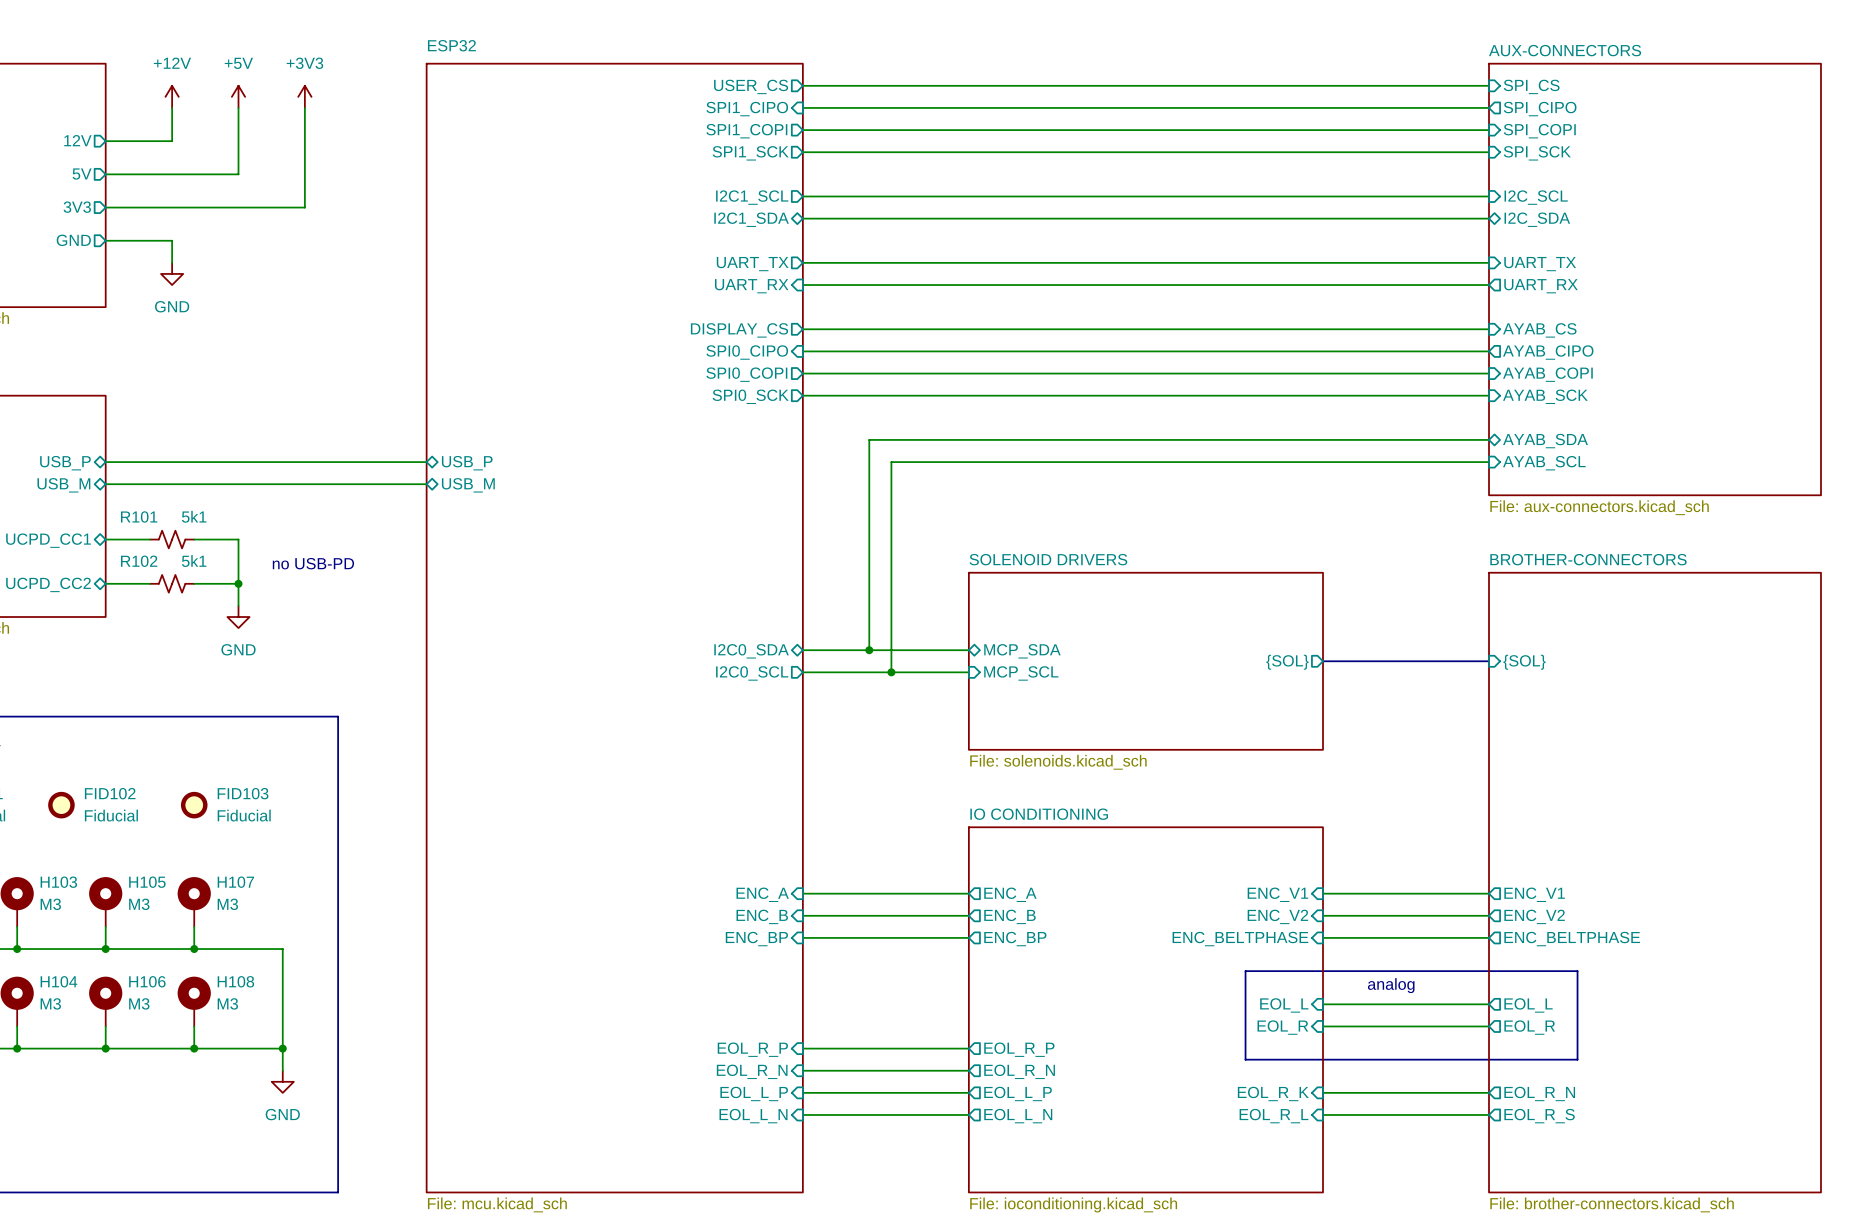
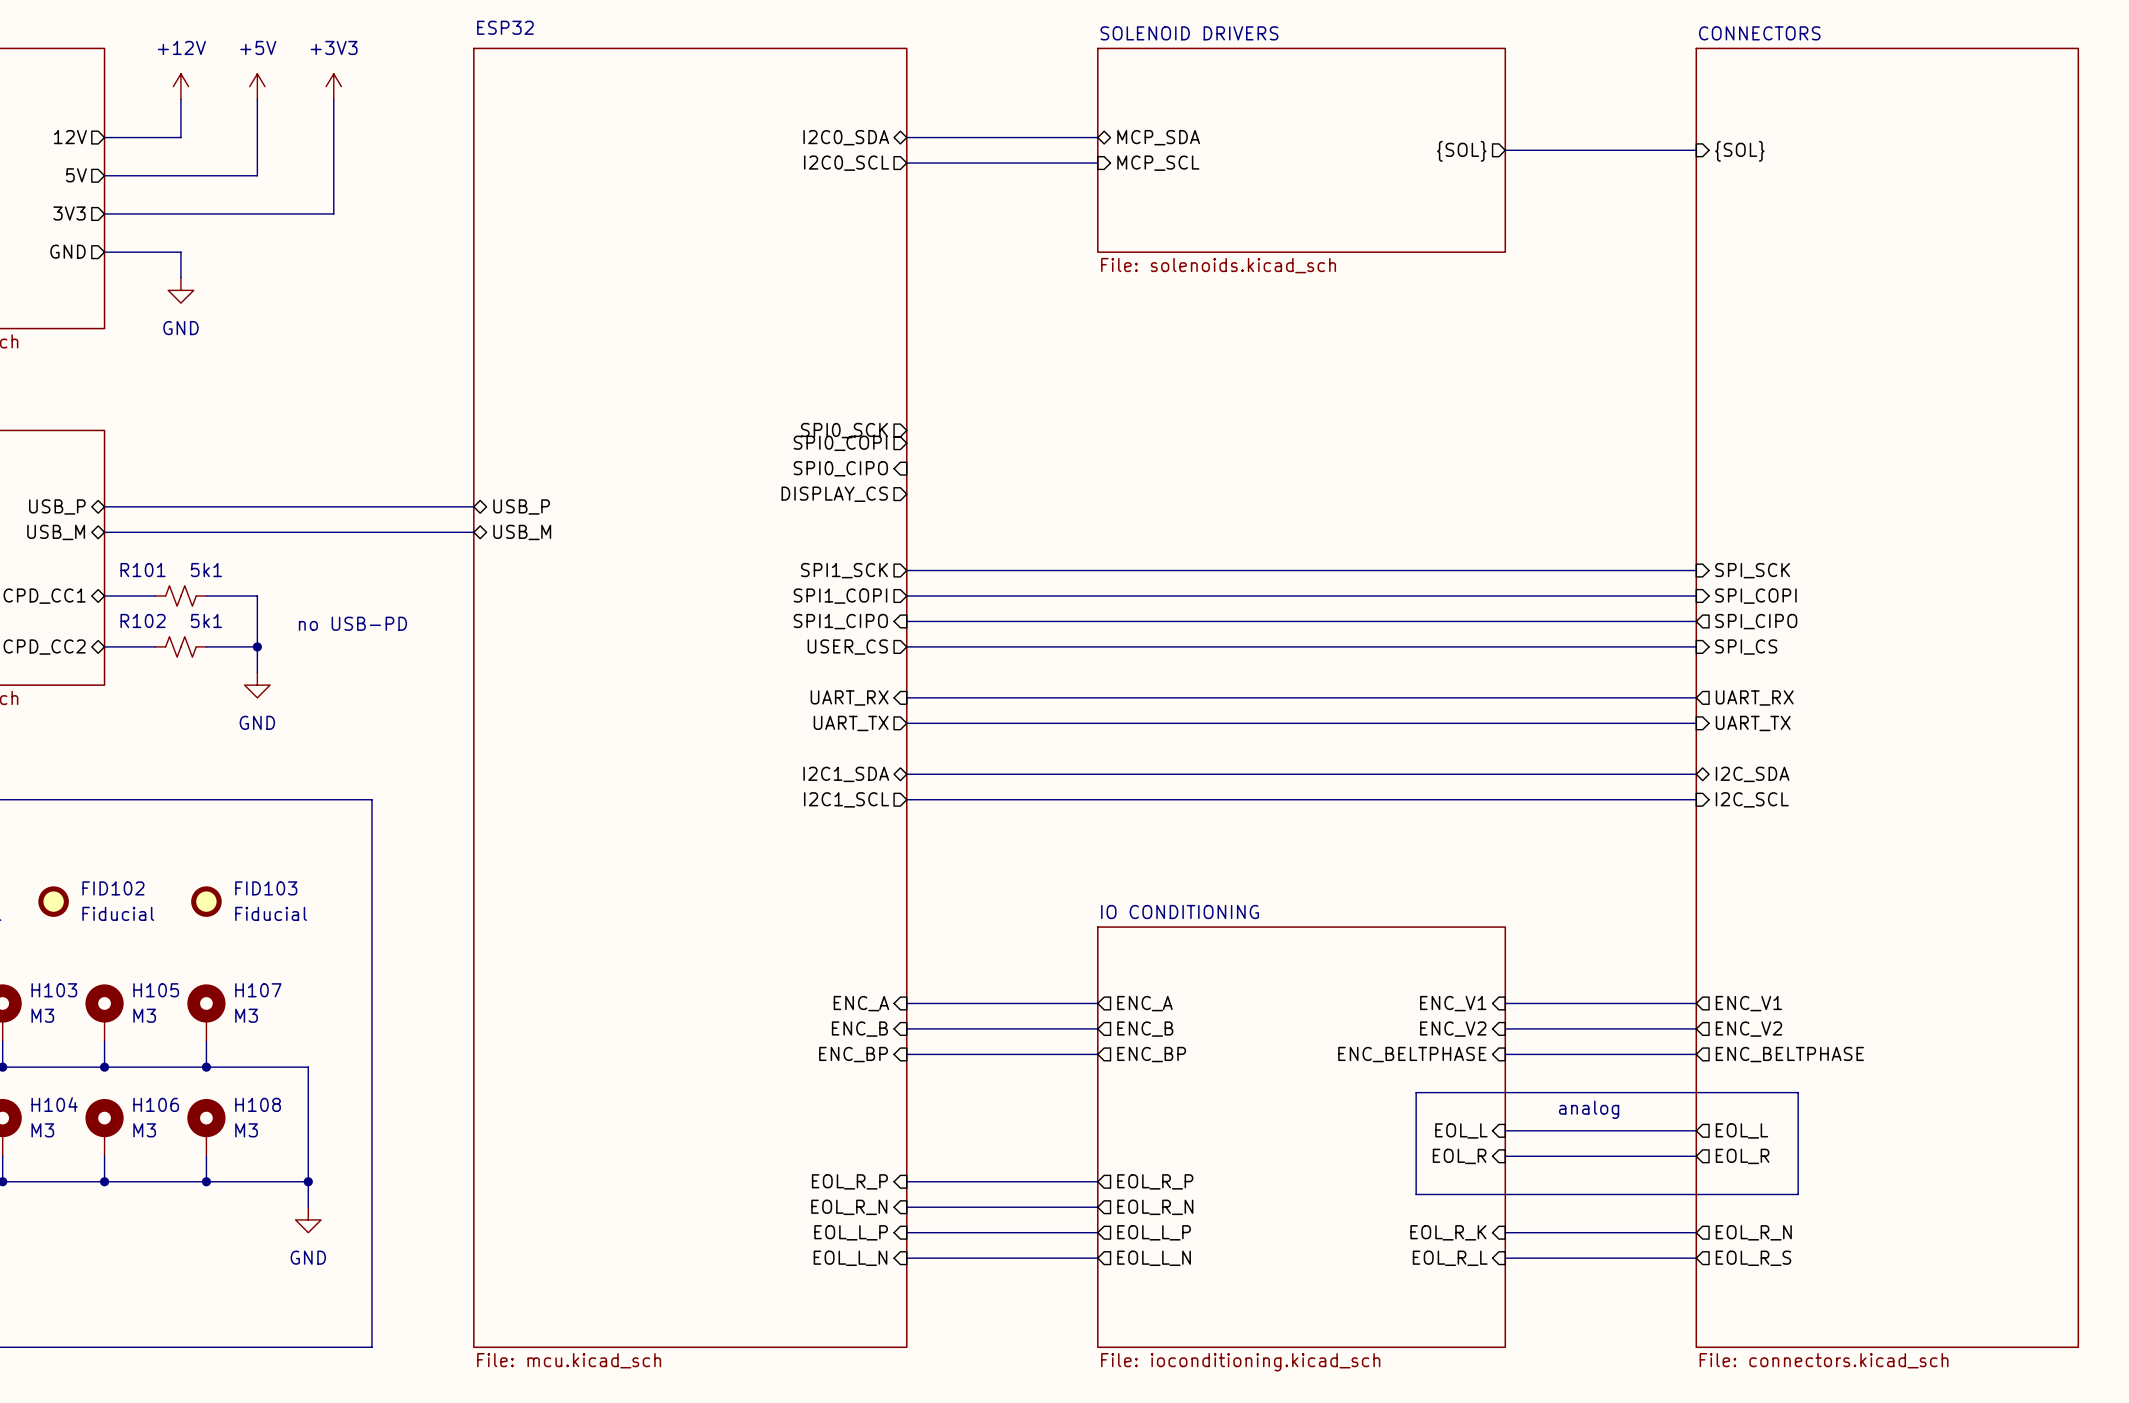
wire: (802, 85) (1489, 85) -> none
sheet pin: USER_CS (751, 86) -> none
sheet pin: SPI_CS (1531, 86) -> none
wire: (802, 107) (1489, 107) -> none
sheet pin: SPI1_CIPO (747, 109) -> none
sheet pin: SPI_CIPO (1540, 109) -> none
wire: (802, 130) (1489, 130) -> none
sheet pin: SPI1_COPI (746, 131) -> none
sheet pin: SPI_COPI (1539, 131) -> none
wire: none -> (906, 137) (1097, 137)
sheet pin: none -> I2C0_SDA (846, 137)
sheet pin: none -> MCP_SDA (1158, 137)
wire: (802, 152) (1489, 152) -> none
sheet SOLENOID DRIVERS: none -> File: solenoids.kicad_sch (1301, 150)
bus: none -> (1505, 150) (1696, 150)
sheet pin: SPI1_SCK (750, 153) -> none
sheet pin: none -> {SOL} (1461, 151)
sheet pin: SPI_SCK (1537, 153) -> {SOL} (1739, 151)
wire: none -> (906, 163) (1097, 163)
sheet pin: none -> I2C0_SCL (846, 163)
sheet pin: none -> MCP_SCL (1158, 163)
wire: (802, 196) (1489, 196) -> none
sheet pin: I2C1_SCL (752, 197) -> none
sheet pin: I2C_SCL (1536, 197) -> none
wire: (802, 218) (1489, 218) -> none
sheet pin: I2C1_SDA (751, 219) -> none
sheet pin: I2C_SDA (1537, 219) -> none
wire: (802, 262) (1489, 262) -> none
sheet pin: UART_TX (752, 264) -> none
sheet pin: UART_TX (1540, 264) -> none
sheet AUX-CONNECTORS: File: aux-connectors.kicad_sch (1654, 279) -> none
wire: (802, 285) (1489, 285) -> none
sheet pin: UART_RX (751, 286) -> none
sheet pin: UART_RX (1541, 286) -> none
wire: (802, 329) (1489, 329) -> (906, 570) (1696, 570)
sheet pin position: DISPLAY_CS (739, 330) -> DISPLAY_CS (834, 494)
sheet pin: AYAB_CS (1539, 330) -> none
wire: (802, 351) (1489, 351) -> (906, 595) (1696, 595)
sheet pin position: SPI0_CIPO (747, 352) -> SPI0_CIPO (840, 468)
sheet pin: AYAB_CIPO (1548, 352) -> none
wire: (802, 373) (1489, 373) -> (906, 621) (1696, 621)
sheet pin position: SPI0_COPI (746, 374) -> SPI0_COPI (840, 443)
sheet pin: AYAB_COPI (1547, 374) -> none
wire: (802, 395) (1489, 395) -> (906, 646) (1696, 646)
sheet pin: AYAB_SCK (1545, 396) -> none
wire: (1489, 439) (869, 439) (869, 650) -> none
sheet pin: AYAB_SDA (1545, 441) -> none
wire: (1489, 462) (891, 462) (891, 672) -> none
sheet pin: AYAB_SCL (1544, 463) -> none
sheet pin: none -> SPI1_SCK (844, 570)
sheet pin: none -> SPI_SCK (1752, 570)
sheet pin: none -> SPI1_COPI (840, 596)
sheet pin: none -> SPI_COPI (1755, 596)
sheet pin: none -> SPI1_CIPO (840, 621)
sheet pin: none -> SPI_CIPO (1756, 621)
sheet pin: none -> USER_CS (847, 647)
sheet pin: none -> SPI_CS (1746, 647)
wire: none -> (906, 697) (1696, 697)
sheet CONNECTORS: none -> File: connectors.kicad_sch (1887, 697)
sheet pin: none -> UART_RX (849, 697)
sheet pin: none -> UART_RX (1754, 697)
junction: (869, 650) -> none
wire: none -> (1097, 723) (1696, 723)
sheet pin shape: bidirectional (751, 651) -> output (851, 723)
sheet pin: I2C0_SDA (751, 651) -> UART_TX (851, 723)
sheet pin: MCP_SDA (1022, 651) -> none
sheet pin: none -> UART_TX (1753, 723)
sheet SOLENOID DRIVERS: File: solenoids.kicad_sch (1145, 661) -> none
bus: (1323, 661) (1489, 661) -> none
sheet pin: {SOL} (1287, 662) -> none
sheet pin: {SOL} (1524, 662) -> none
wire: (802, 672) (968, 672) -> none
junction: (891, 672) -> none
sheet pin shape: output (752, 673) -> bidirectional (846, 774)
sheet pin: I2C0_SCL (752, 673) -> I2C1_SDA (846, 774)
sheet pin: MCP_SCL (1021, 673) -> none
wire: none -> (906, 774) (1696, 774)
sheet pin: none -> I2C_SDA (1752, 774)
wire: none -> (906, 799) (1696, 799)
sheet pin: none -> I2C1_SCL (846, 799)
sheet pin: none -> I2C_SCL (1752, 799)
sheet BROTHER-CONNECTORS: File: brother-connectors.kicad_sch (1654, 882) -> none

